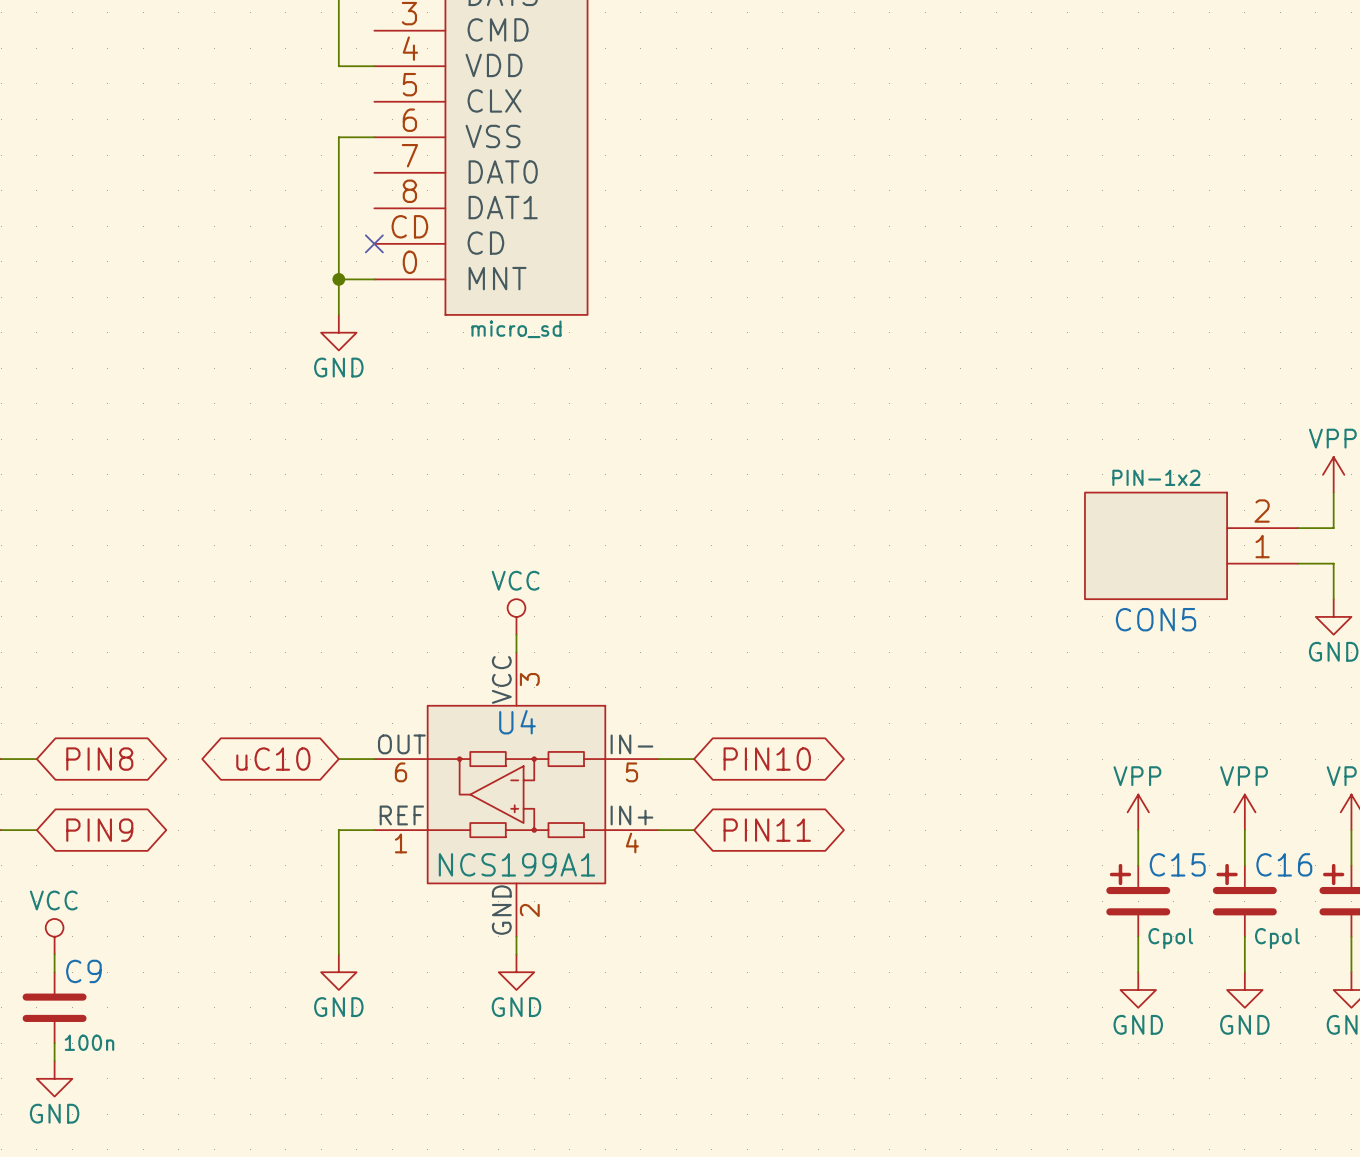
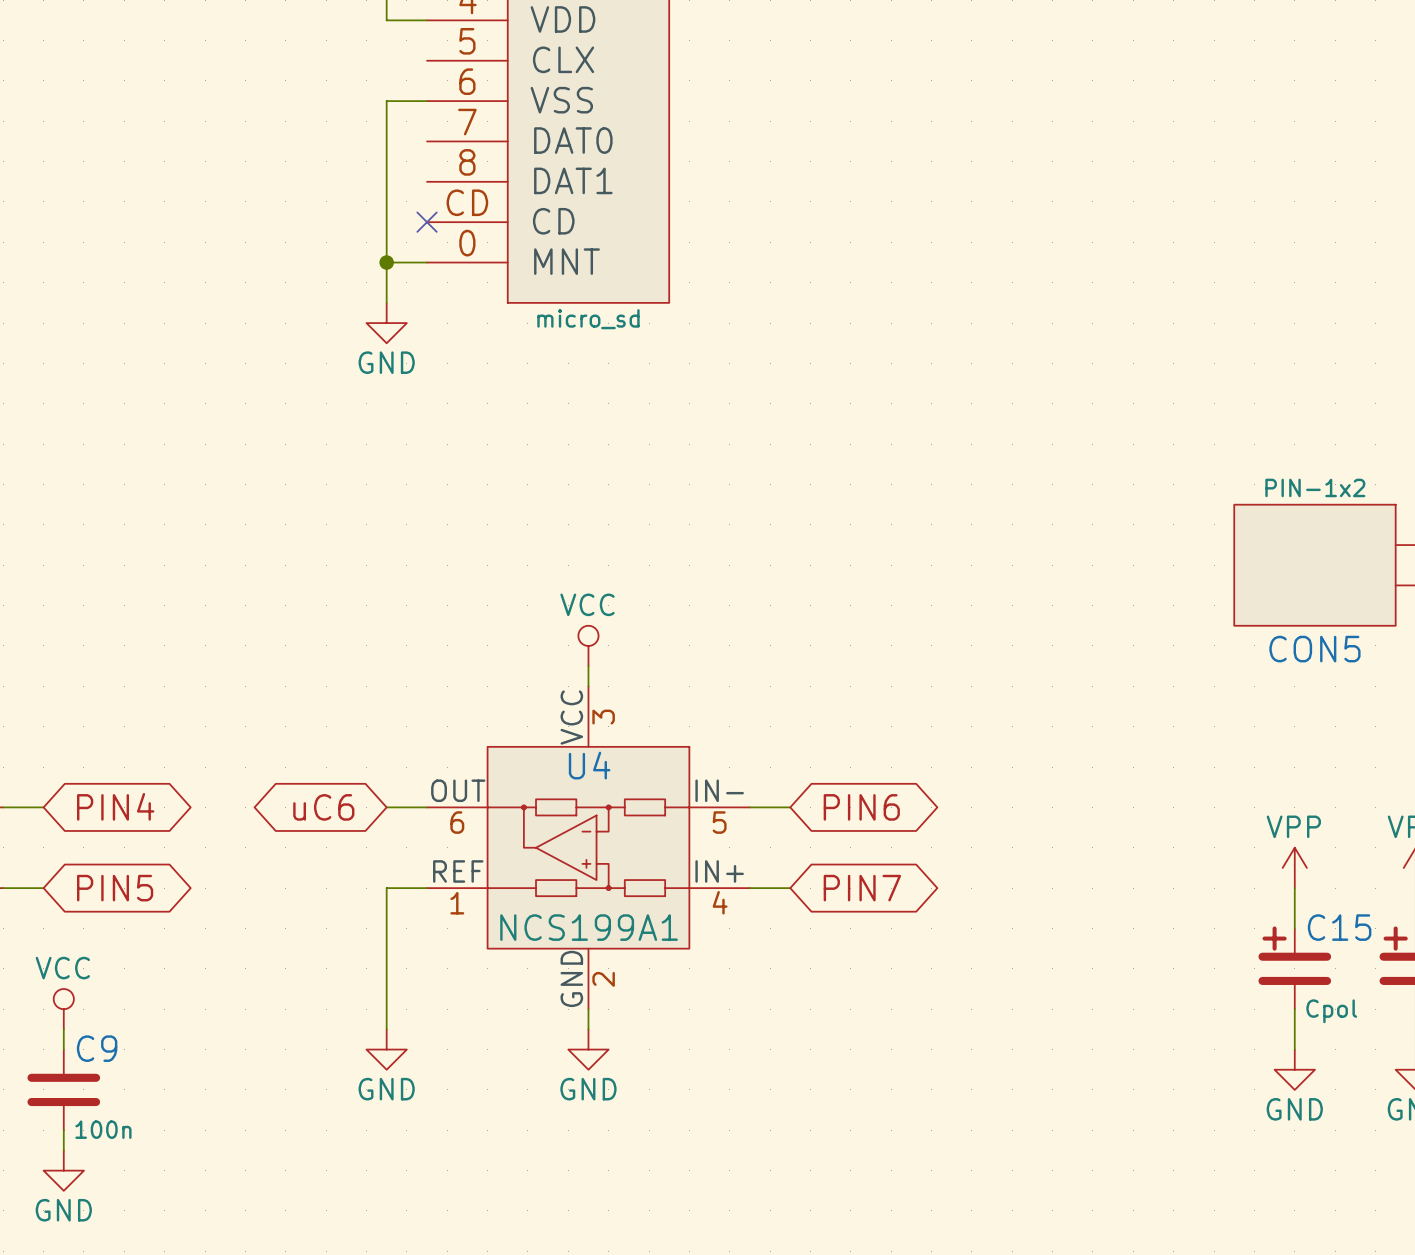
global label: PIN8 (99, 759) -> PIN4 (115, 806)
global label: uC10 (273, 759) -> uC6 (323, 807)
global label: PIN10 (767, 759) -> PIN6 (861, 807)
global label: PIN9 (99, 830) -> PIN5 (115, 888)
global label: PIN11 (767, 830) -> PIN7 (862, 888)

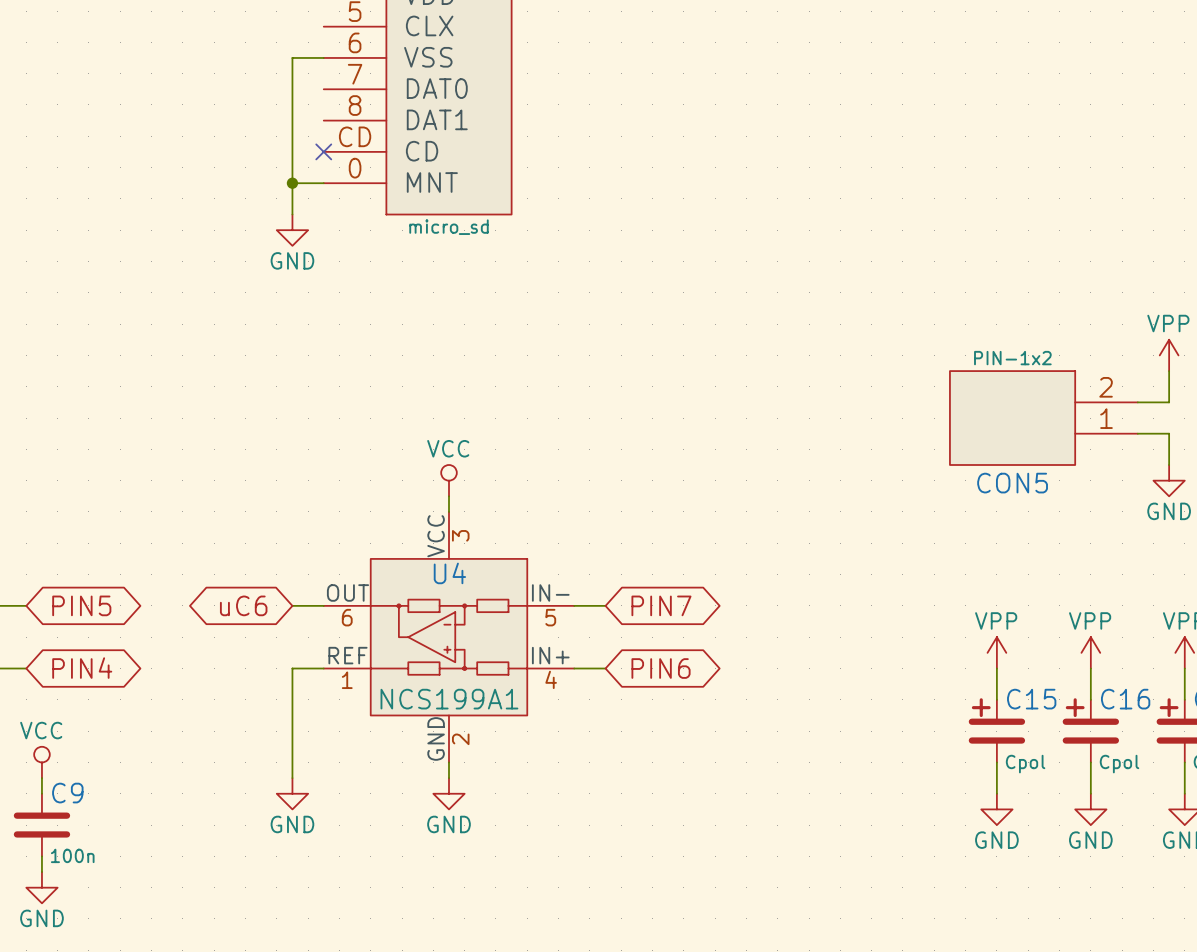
global label: PIN4 (115, 806) -> PIN5 (81, 605)
global label: PIN6 (861, 807) -> PIN7 (661, 605)
global label: PIN5 (115, 888) -> PIN4 (82, 668)
global label: PIN7 (862, 888) -> PIN6 (661, 668)

